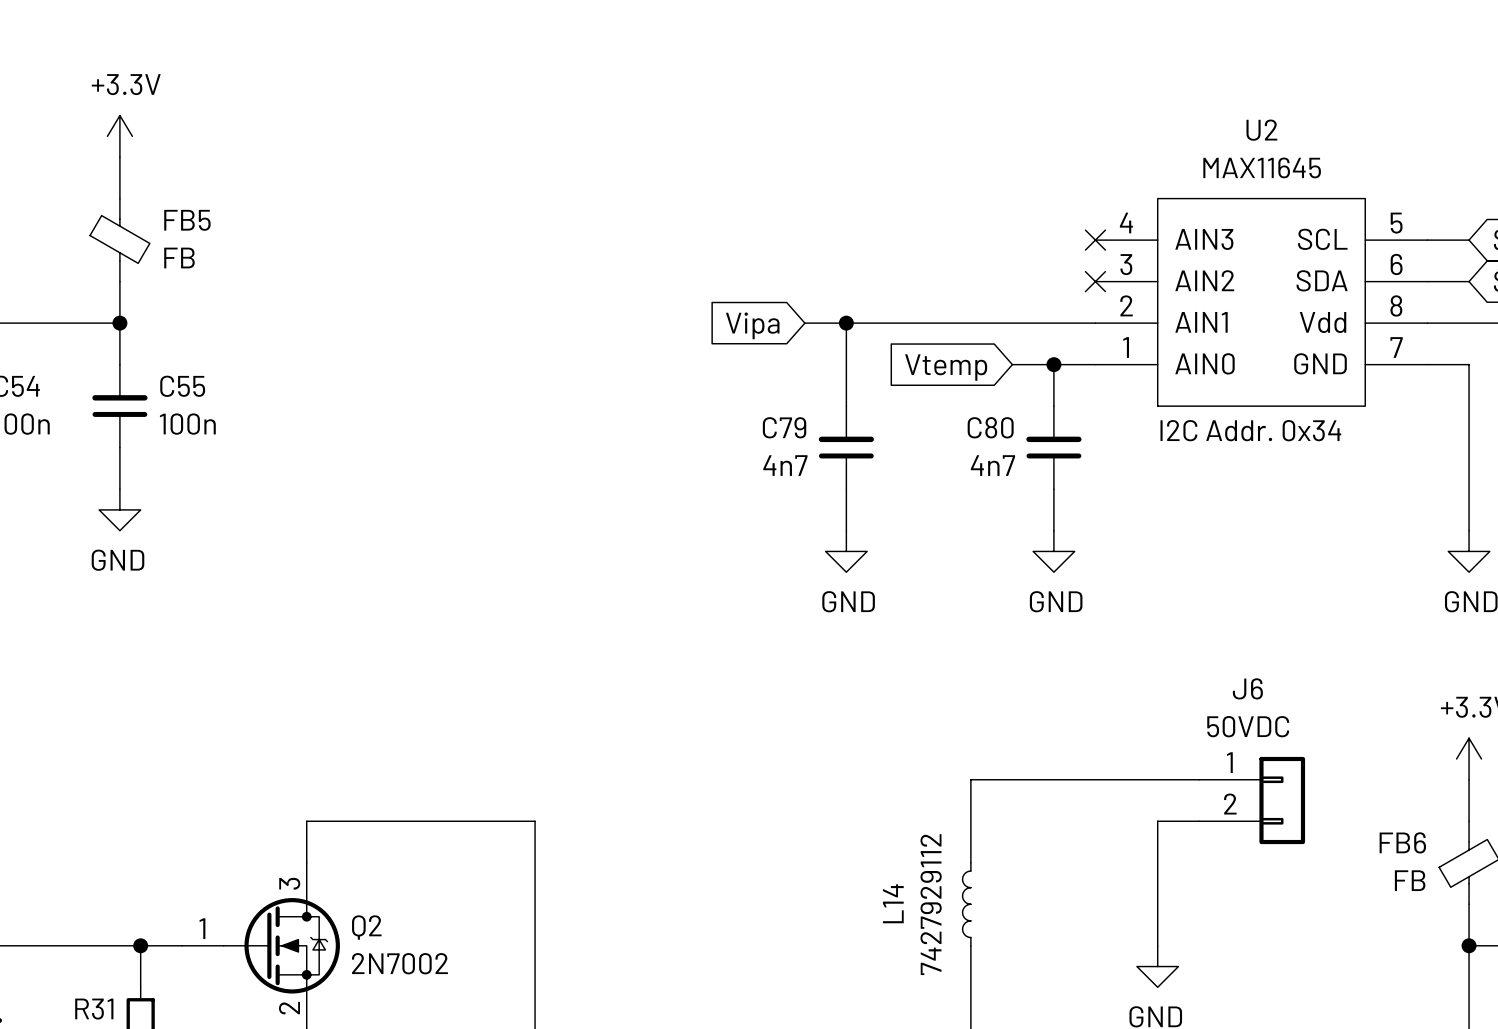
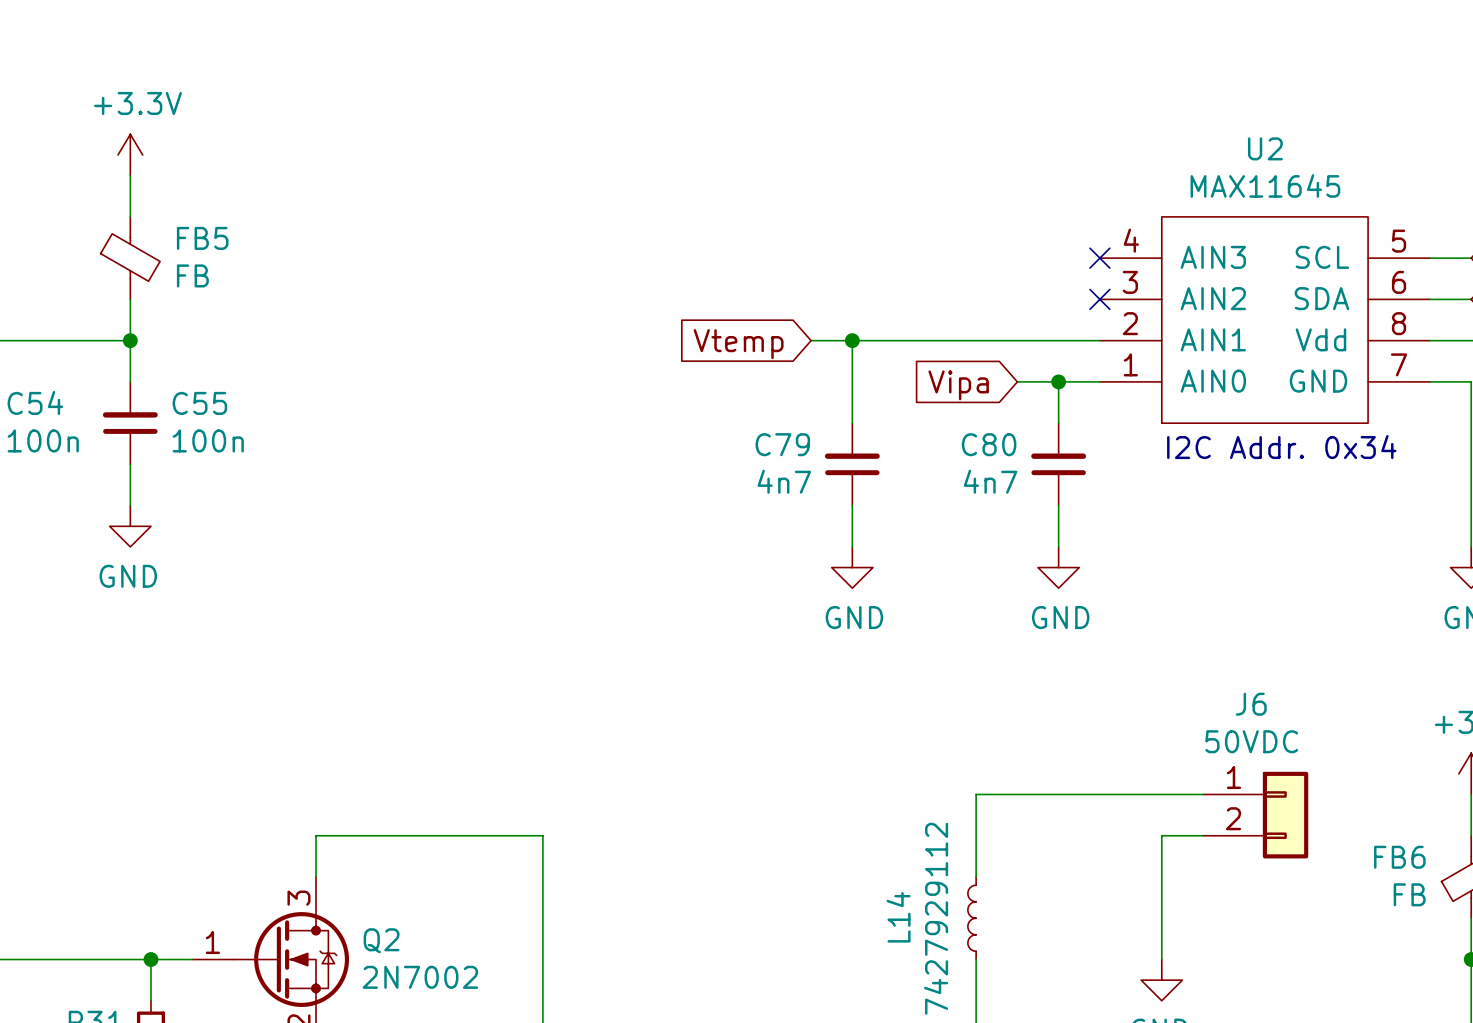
global label: Vipa (752, 325) -> Vtemp (738, 344)
global label: Vtemp (946, 367) -> Vipa (958, 385)

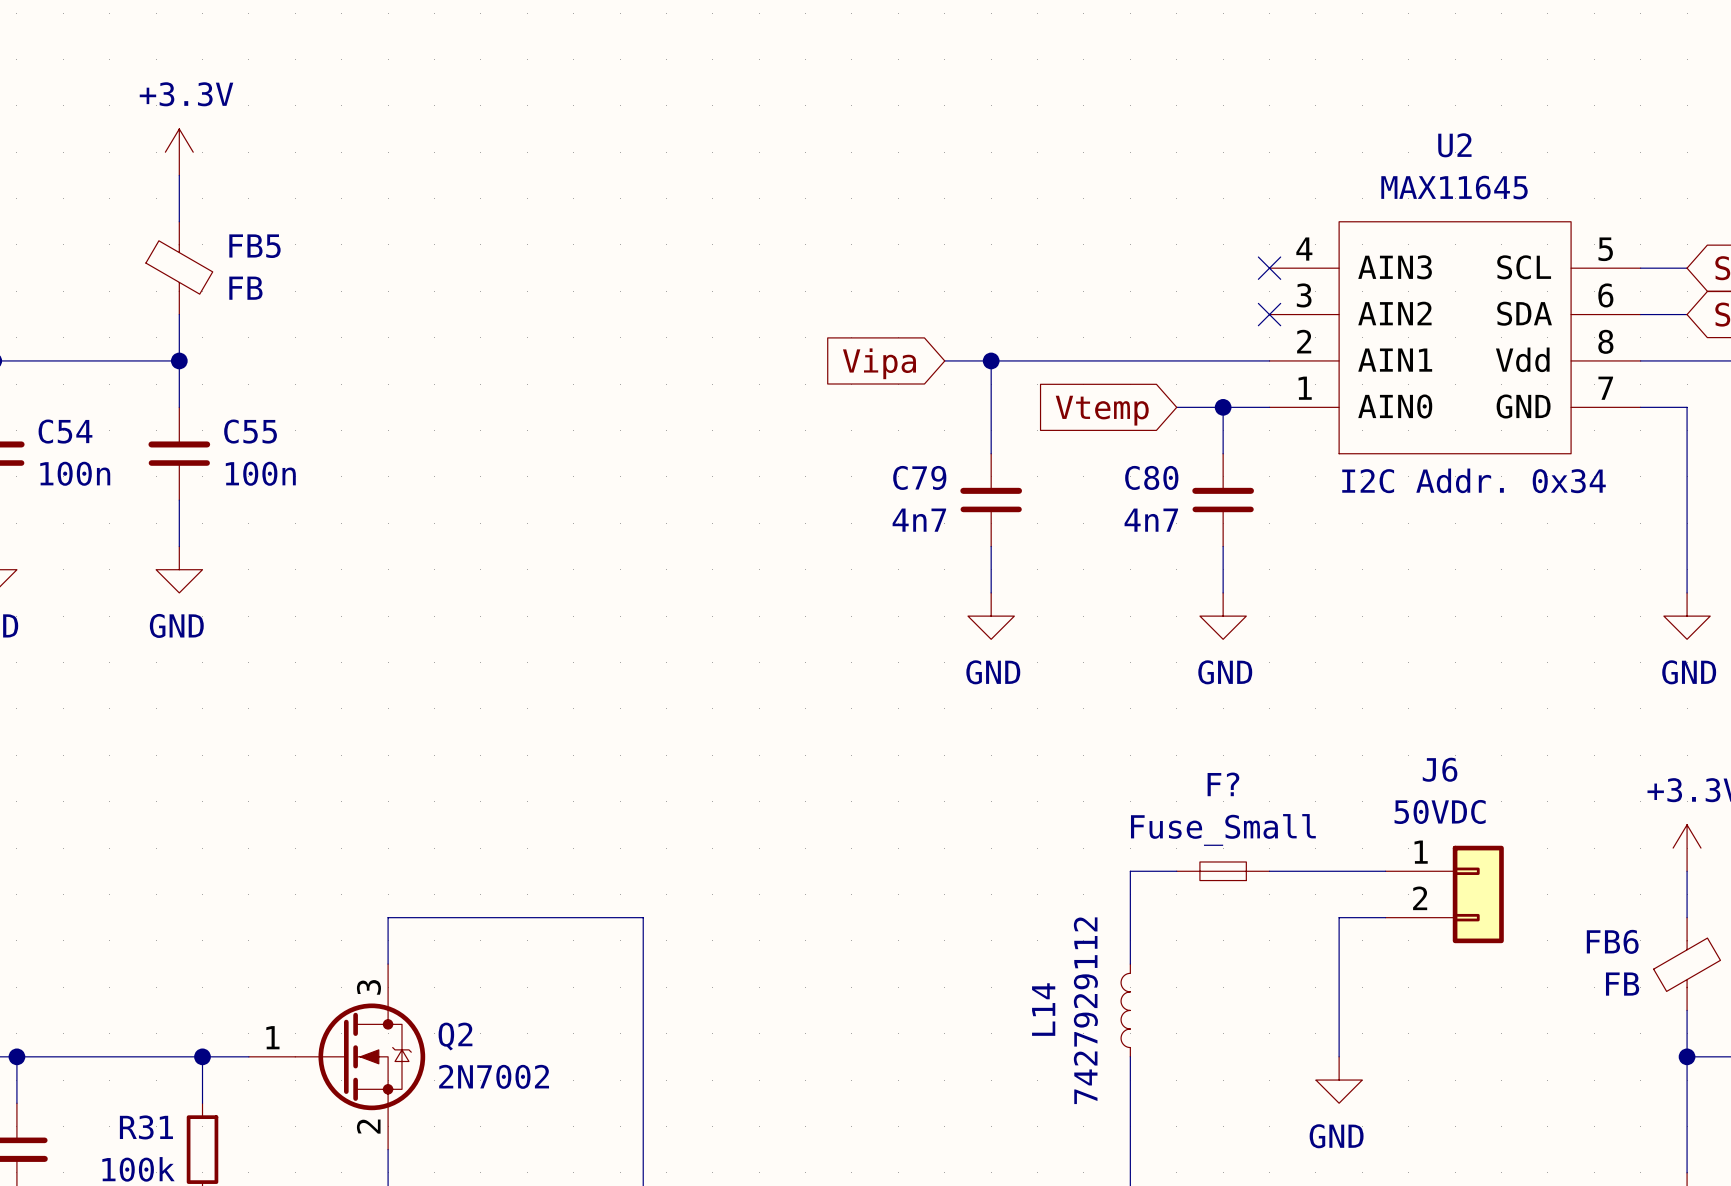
global label: Vtemp (738, 344) -> Vipa (879, 363)
global label: Vipa (958, 385) -> Vtemp (1102, 410)
F?: none -> Fuse_Small (1223, 871)

